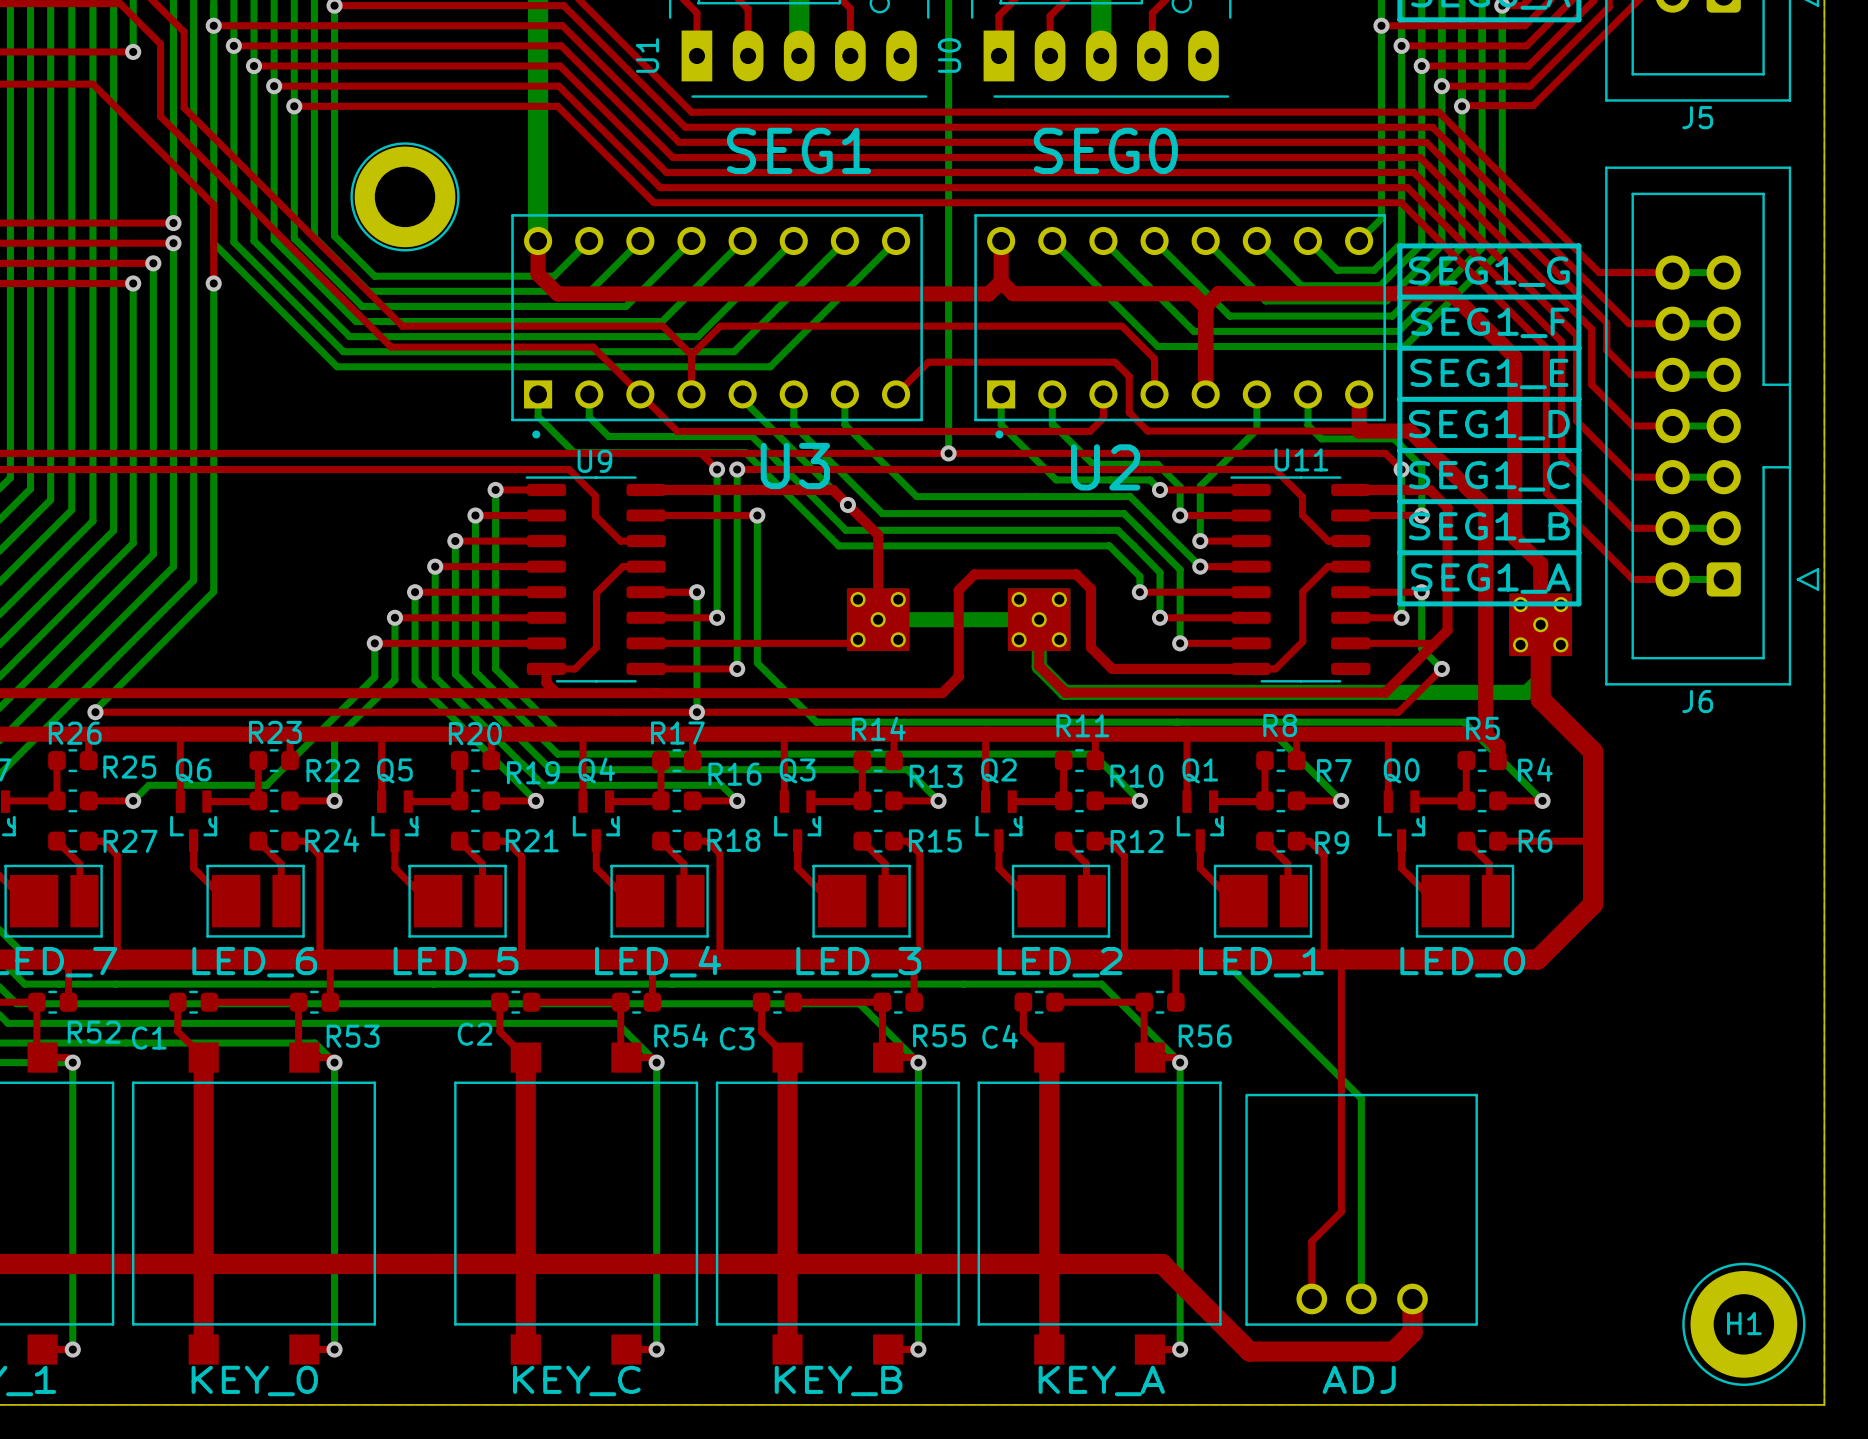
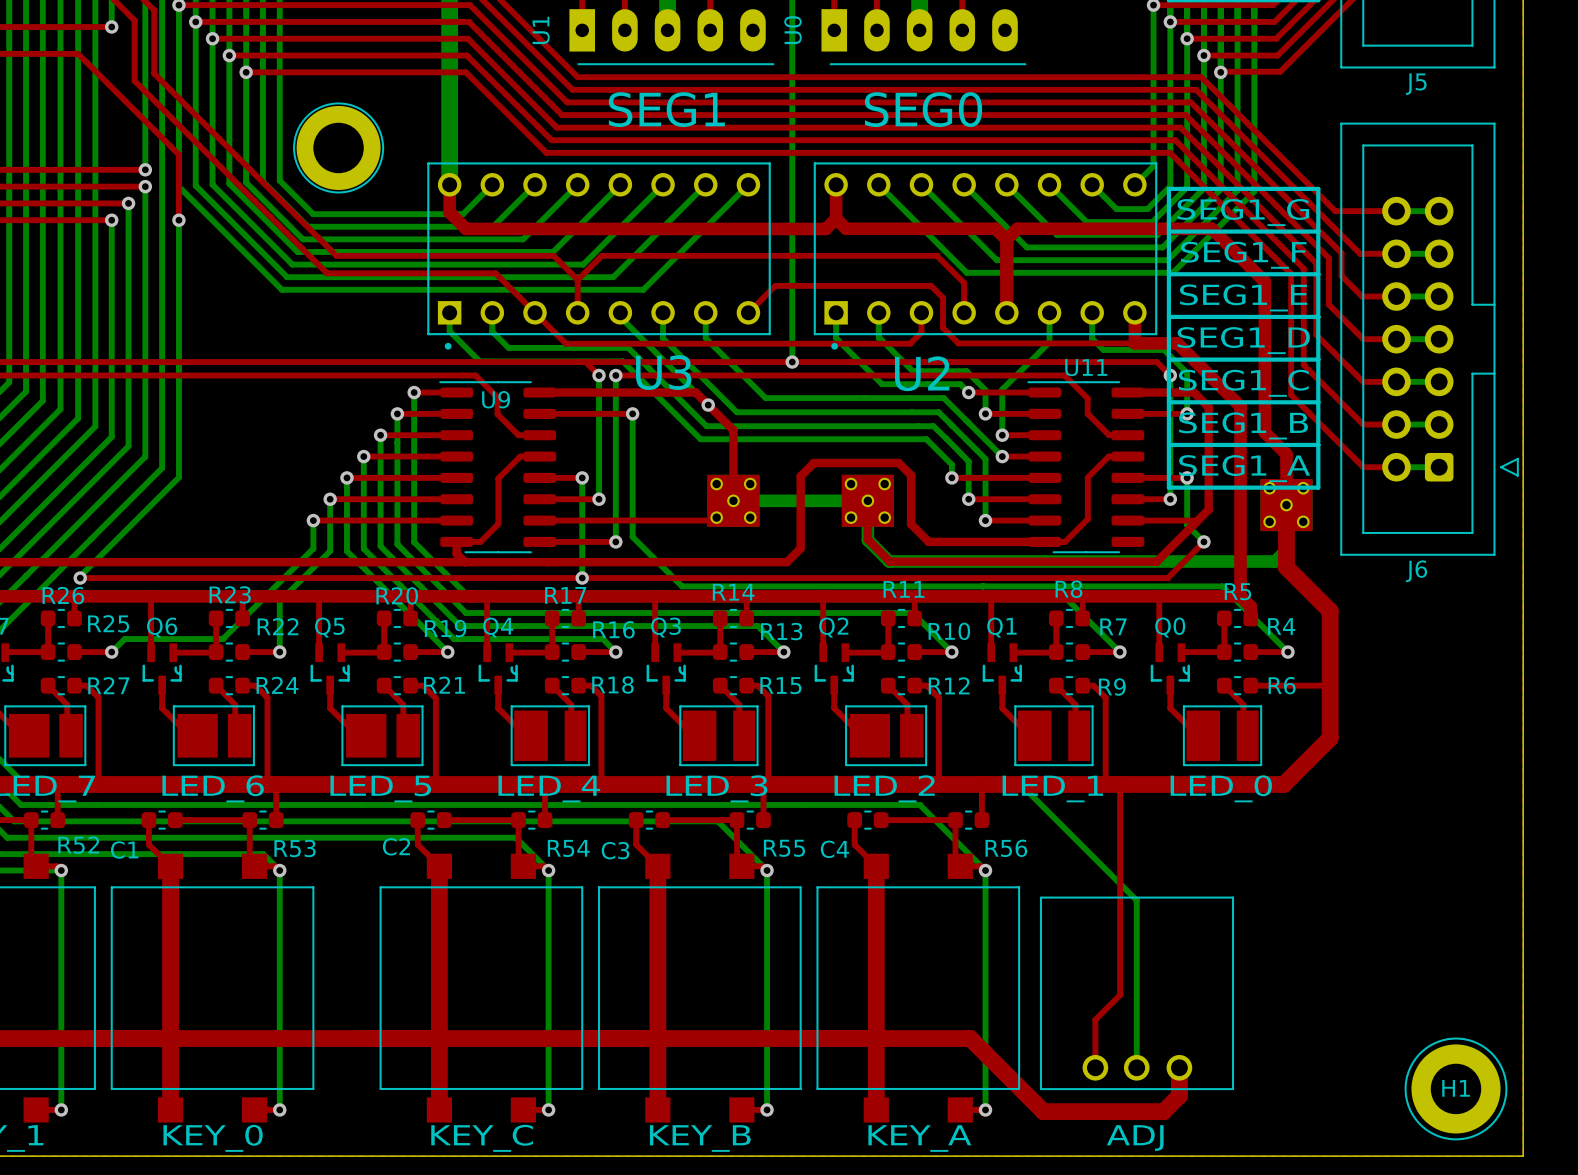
U9 name position: U9 (594, 461) -> U9 (496, 399)
part footprint: [610, 864, 709, 938] -> [510, 705, 590, 767]
part footprint: [812, 864, 911, 938] -> [679, 705, 759, 767]
part footprint: [1213, 864, 1313, 938] -> [1014, 705, 1094, 767]
part footprint: [1415, 864, 1515, 938] -> [1182, 705, 1263, 767]

